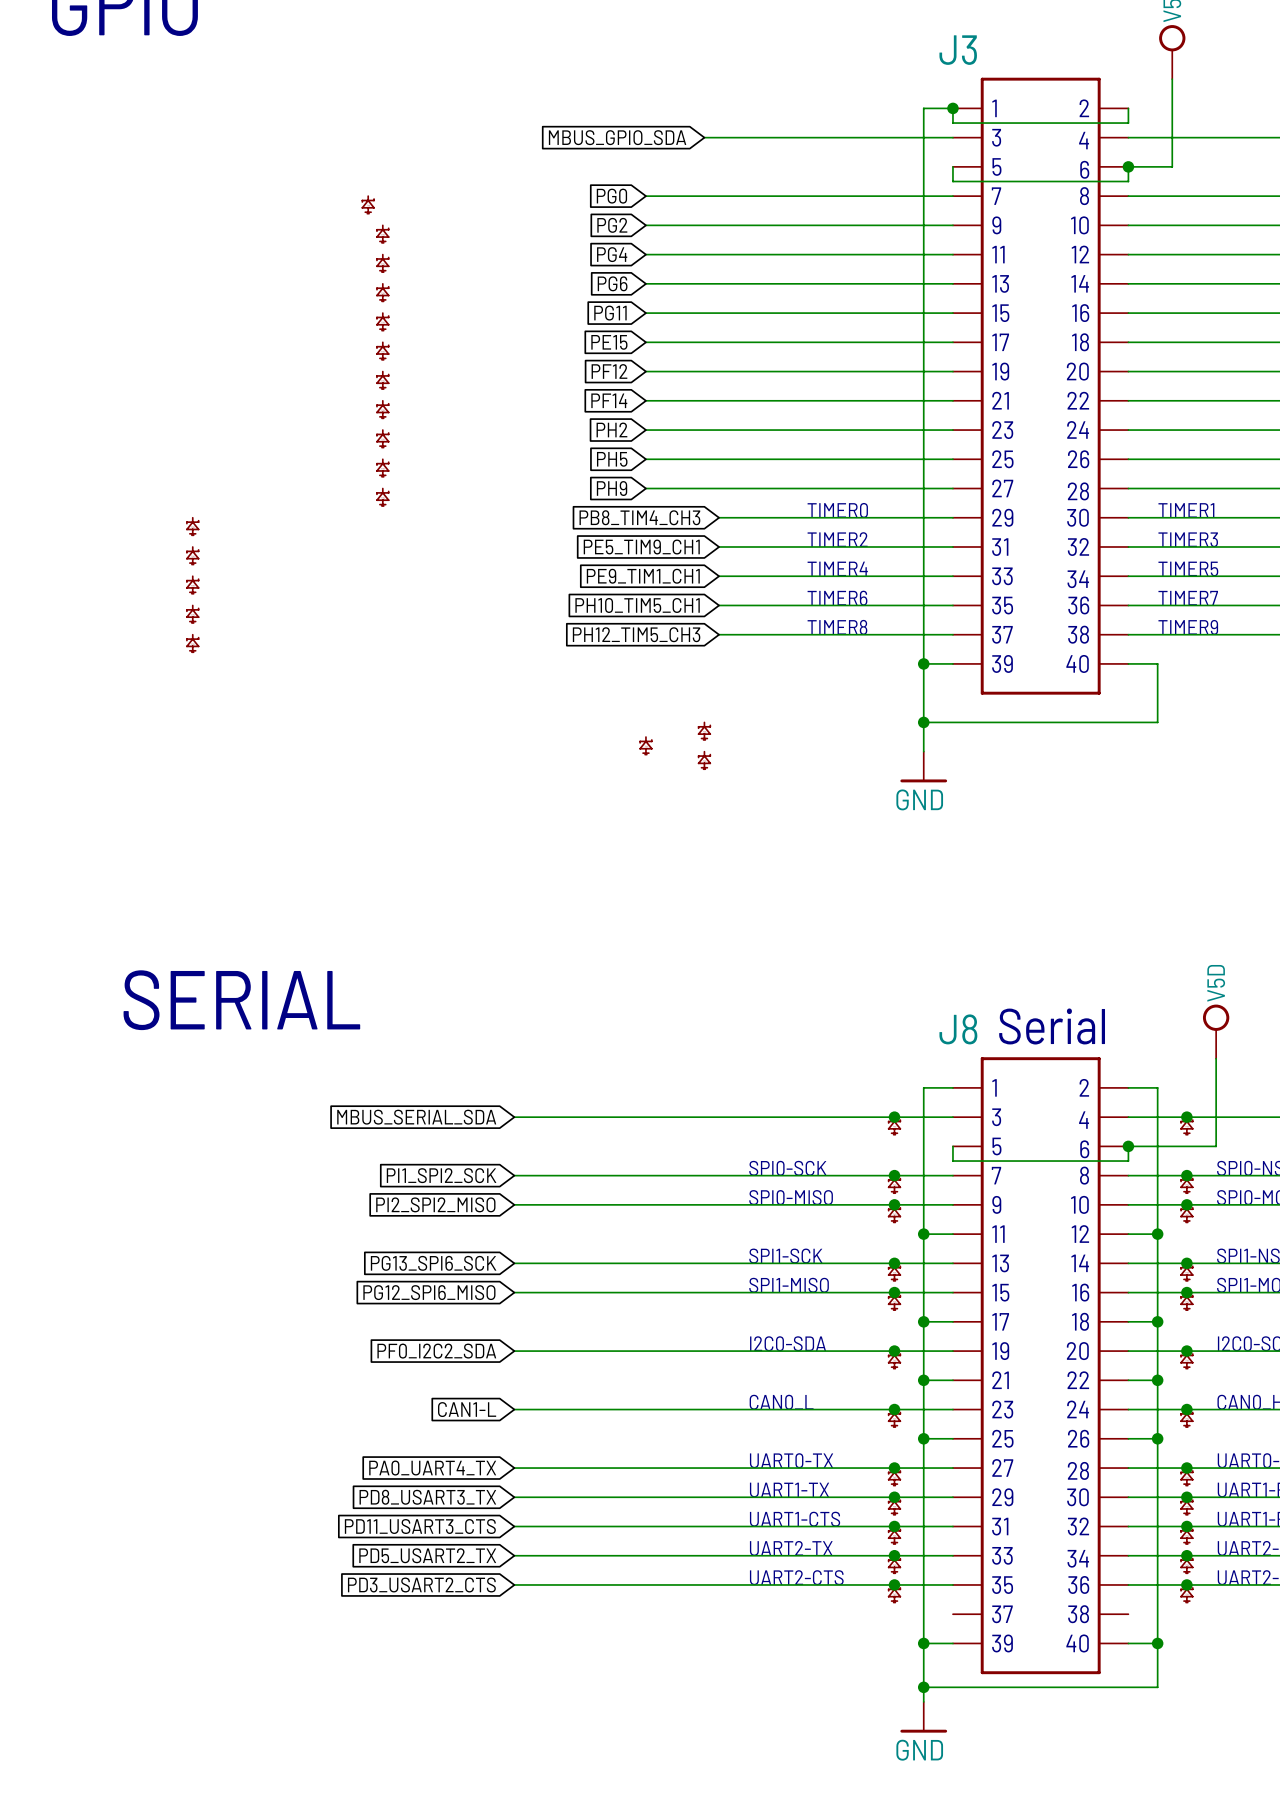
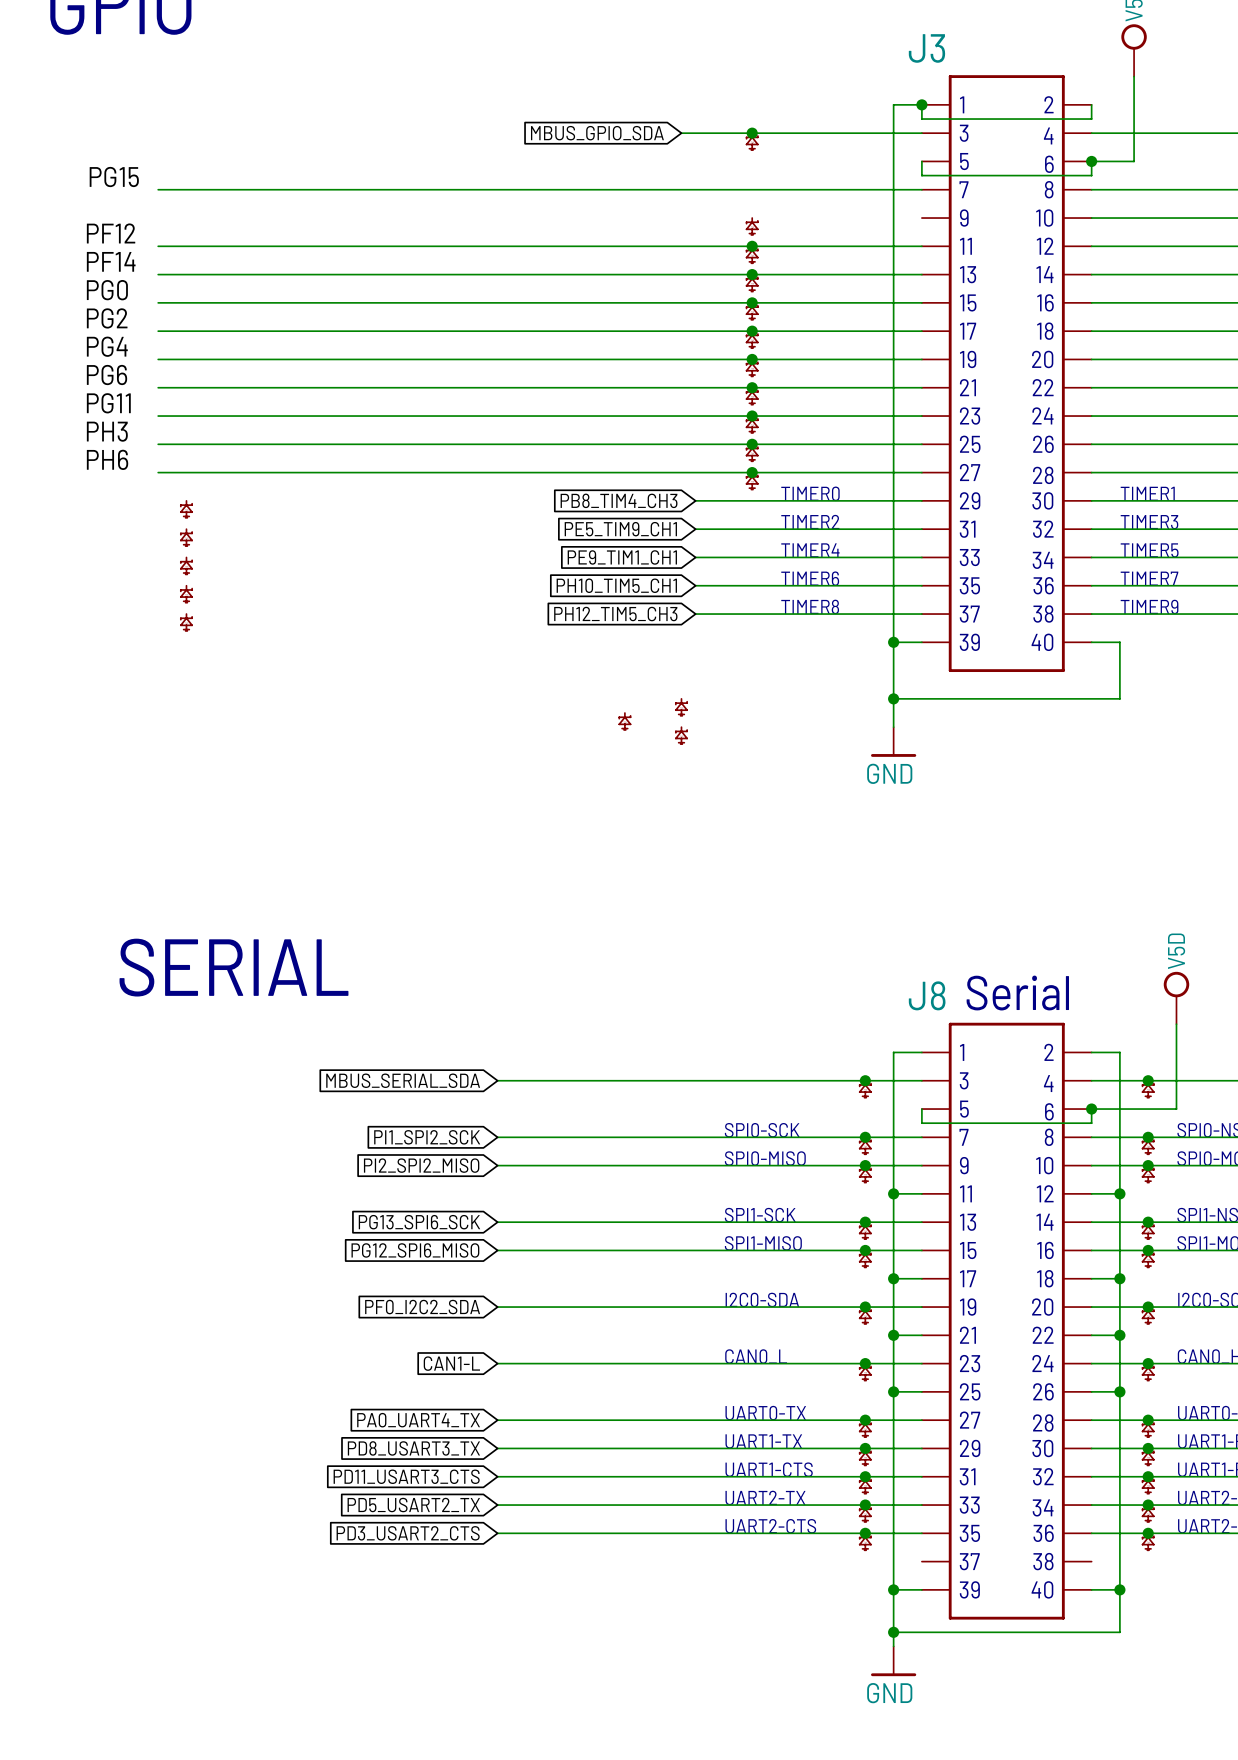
junction: none -> (752, 133)
part: none -> (752, 141)
label: none -> PG15 (114, 177)
wire: none -> (158, 189) (624, 189)
global label: PG0 (611, 196) -> none
part: (368, 204) -> none
global label: PG2 (612, 225) -> none
wire: (645, 225) (952, 225) -> none
part: (382, 234) -> none
part: none -> (752, 226)
label: none -> PF12 (111, 233)
wire: none -> (158, 246) (624, 246)
global label: PG4 (612, 254) -> none
junction: none -> (752, 246)
part: (382, 263) -> none
part: none -> (752, 254)
label: none -> PF14 (111, 261)
wire: none -> (158, 274) (624, 274)
global label: PG6 (612, 283) -> none
junction: none -> (752, 274)
part: (382, 292) -> none
part: none -> (752, 283)
label: none -> PG0 (107, 290)
wire: none -> (158, 302) (624, 302)
global label: PG11 (610, 313) -> none
junction: none -> (752, 302)
part: (382, 321) -> none
part: none -> (752, 311)
label: none -> PG2 (107, 318)
wire: none -> (158, 331) (624, 331)
global label: PE15 (609, 342) -> none
junction: none -> (752, 331)
part: (382, 351) -> none
part: none -> (752, 339)
label: none -> PG4 (107, 346)
wire: none -> (158, 359) (624, 359)
global label: PF12 (609, 371) -> none
junction: none -> (752, 359)
part: (382, 380) -> none
part: none -> (752, 367)
label: none -> PG6 (107, 375)
wire: none -> (158, 387) (624, 387)
global label: PF14 (609, 400) -> none
junction: none -> (752, 387)
part: (382, 409) -> none
part: none -> (752, 396)
label: none -> PG11 (108, 403)
global label: PH2 (611, 429) -> none
wire: none -> (158, 416) (624, 416)
junction: none -> (752, 416)
part: (382, 438) -> none
part: none -> (752, 424)
label: none -> PH3 (107, 431)
wire: none -> (158, 444) (624, 444)
global label: PH5 (612, 459) -> none
junction: none -> (752, 444)
part: (382, 468) -> none
part: none -> (752, 452)
label: none -> PH6 (107, 459)
wire: none -> (158, 472) (624, 472)
global label: PH9 (612, 488) -> none
junction: none -> (752, 472)
part: (382, 497) -> none
part: none -> (752, 481)

